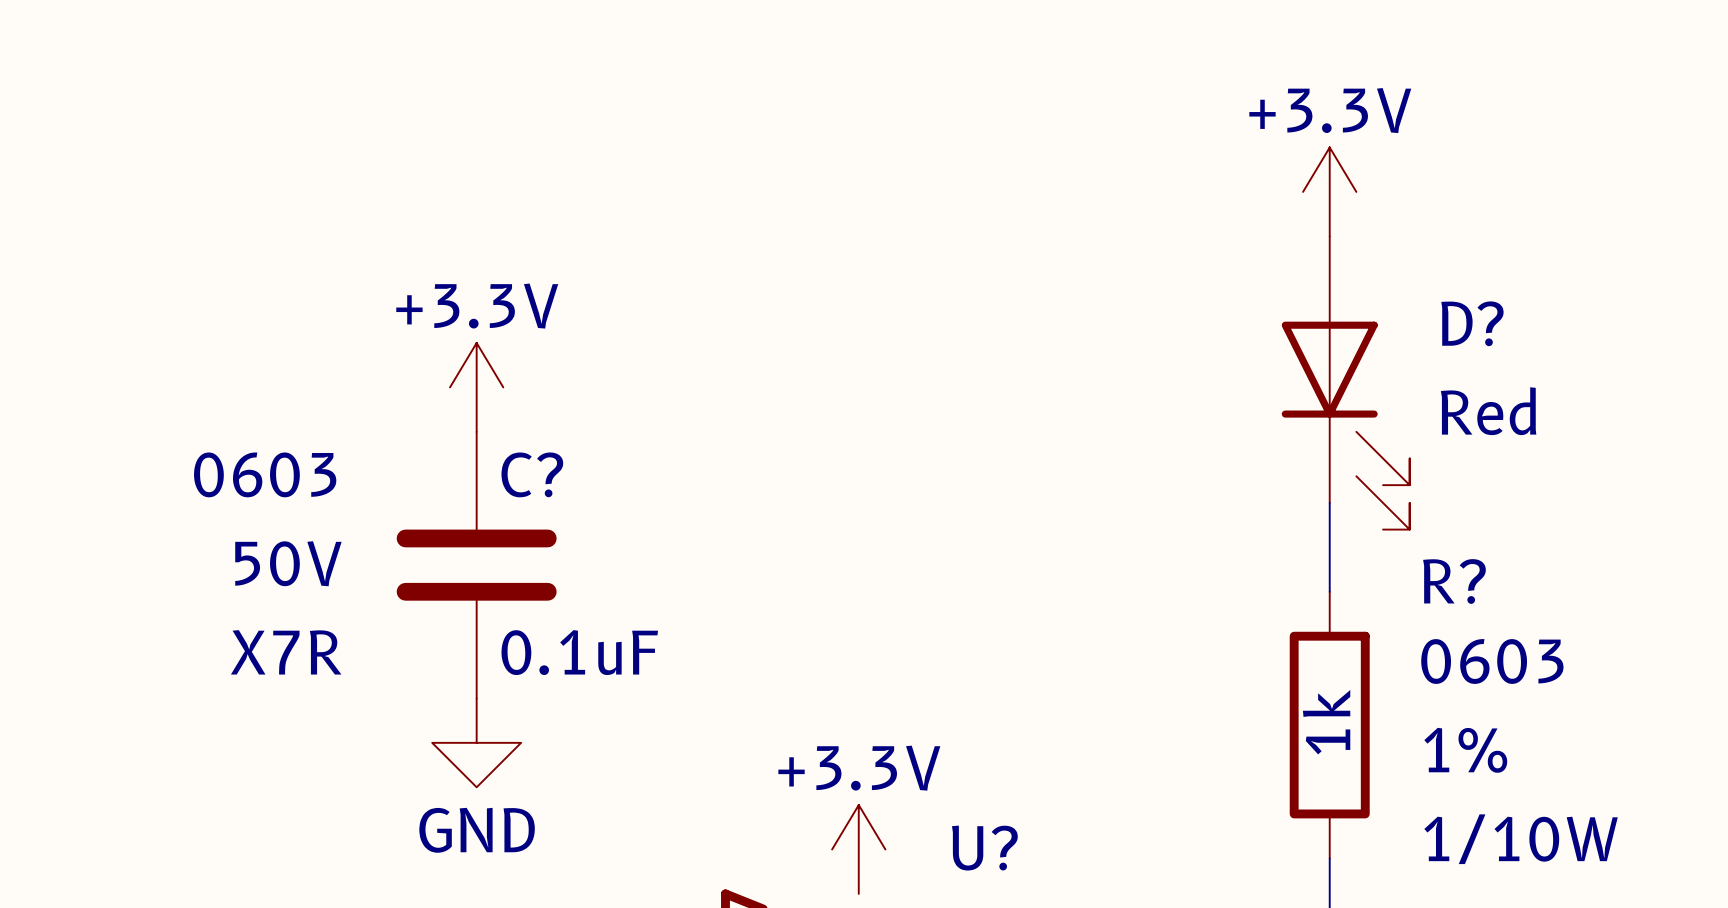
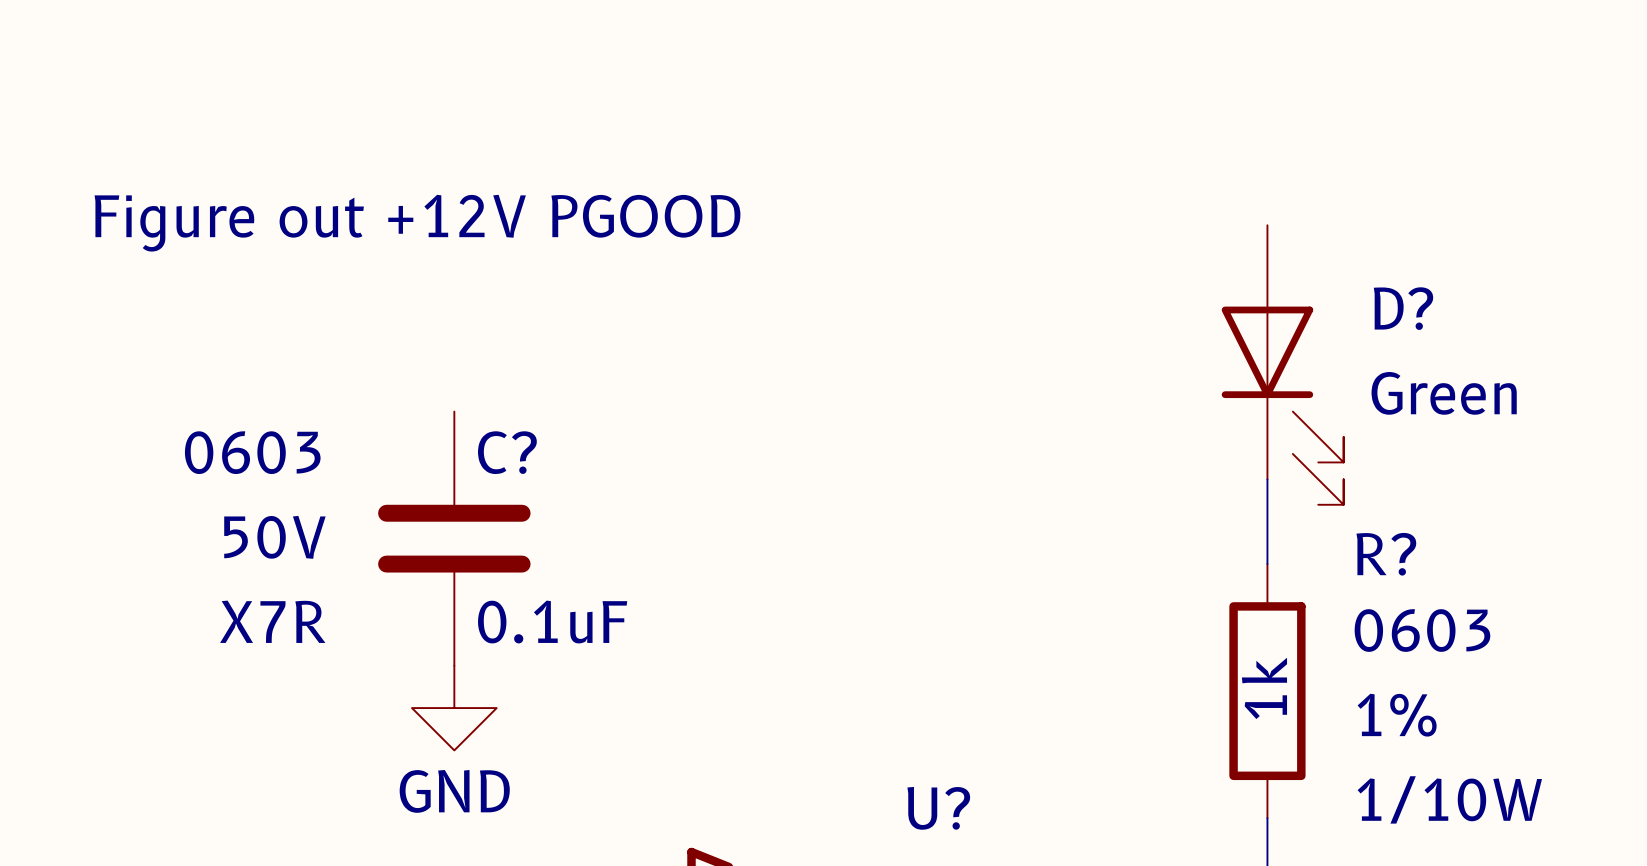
power symbol: +3.3V (1329, 191) -> none
text: none -> Figure out +12V PGOOD (417, 223)
power symbol: +3.3V (476, 387) -> none
D? value: Red (1488, 411) -> Green (1444, 393)
power symbol: +3.3V (858, 849) -> none

